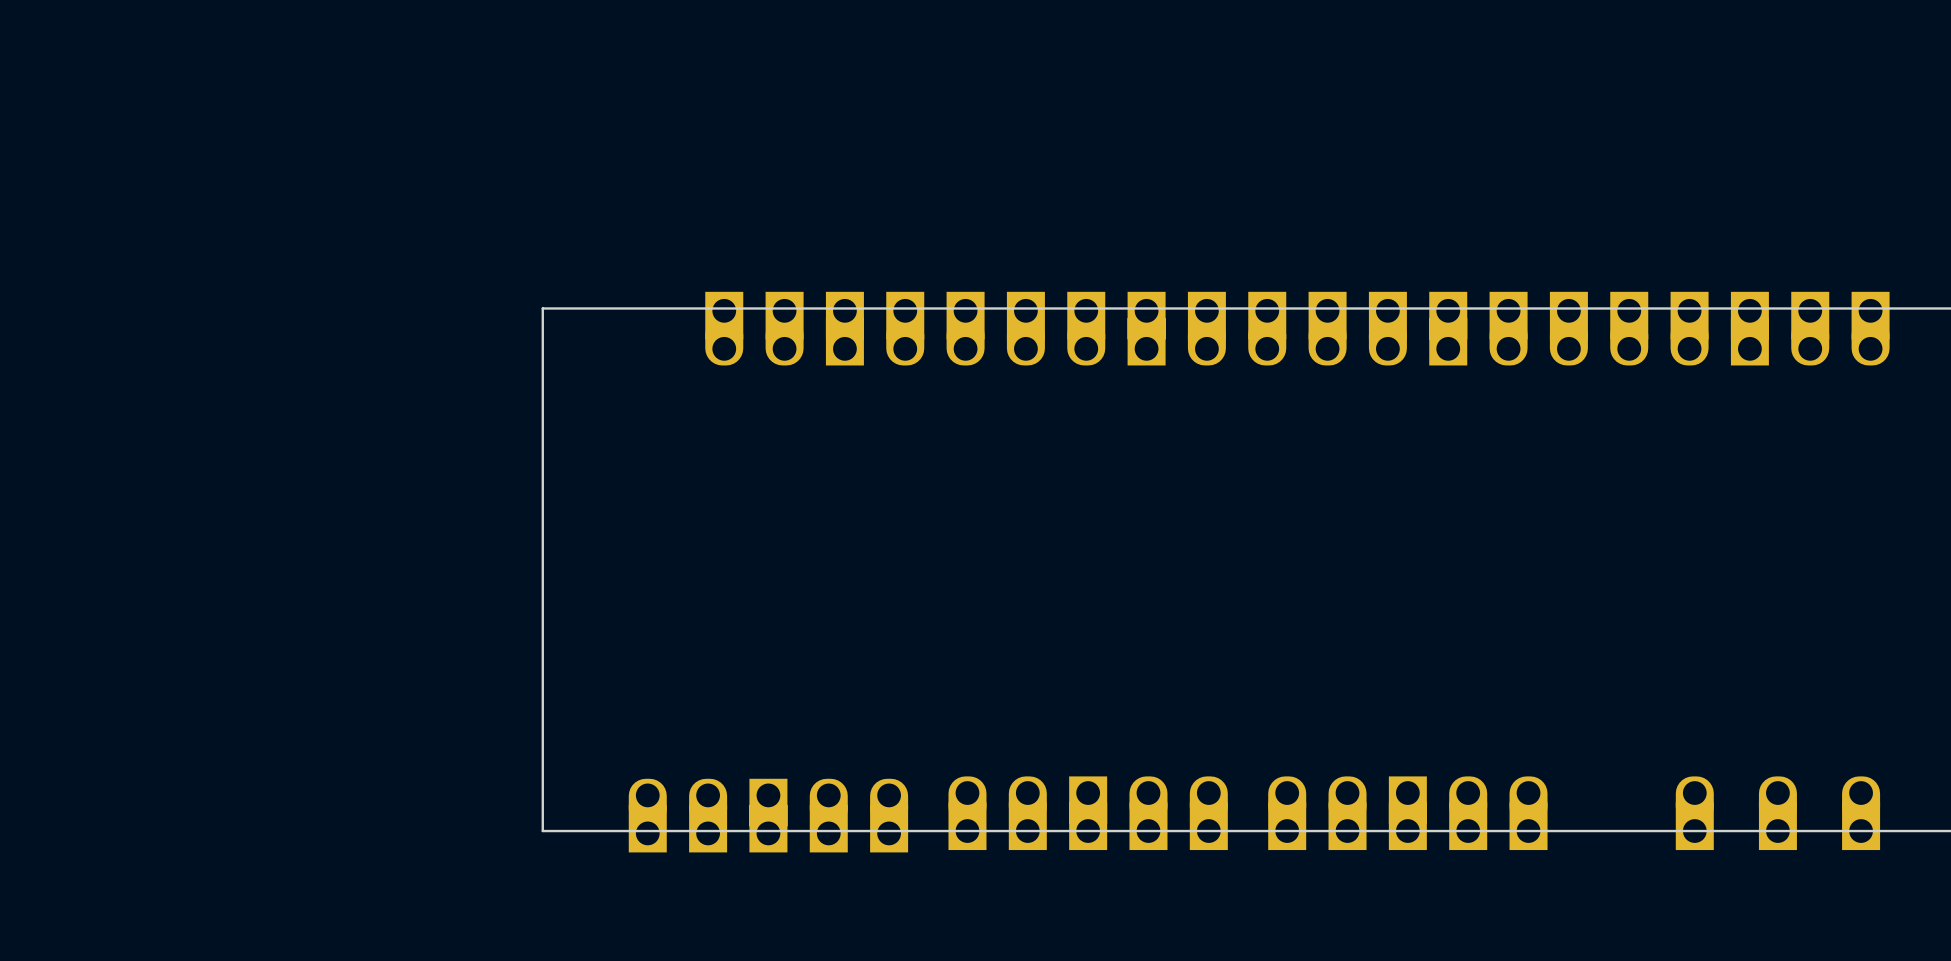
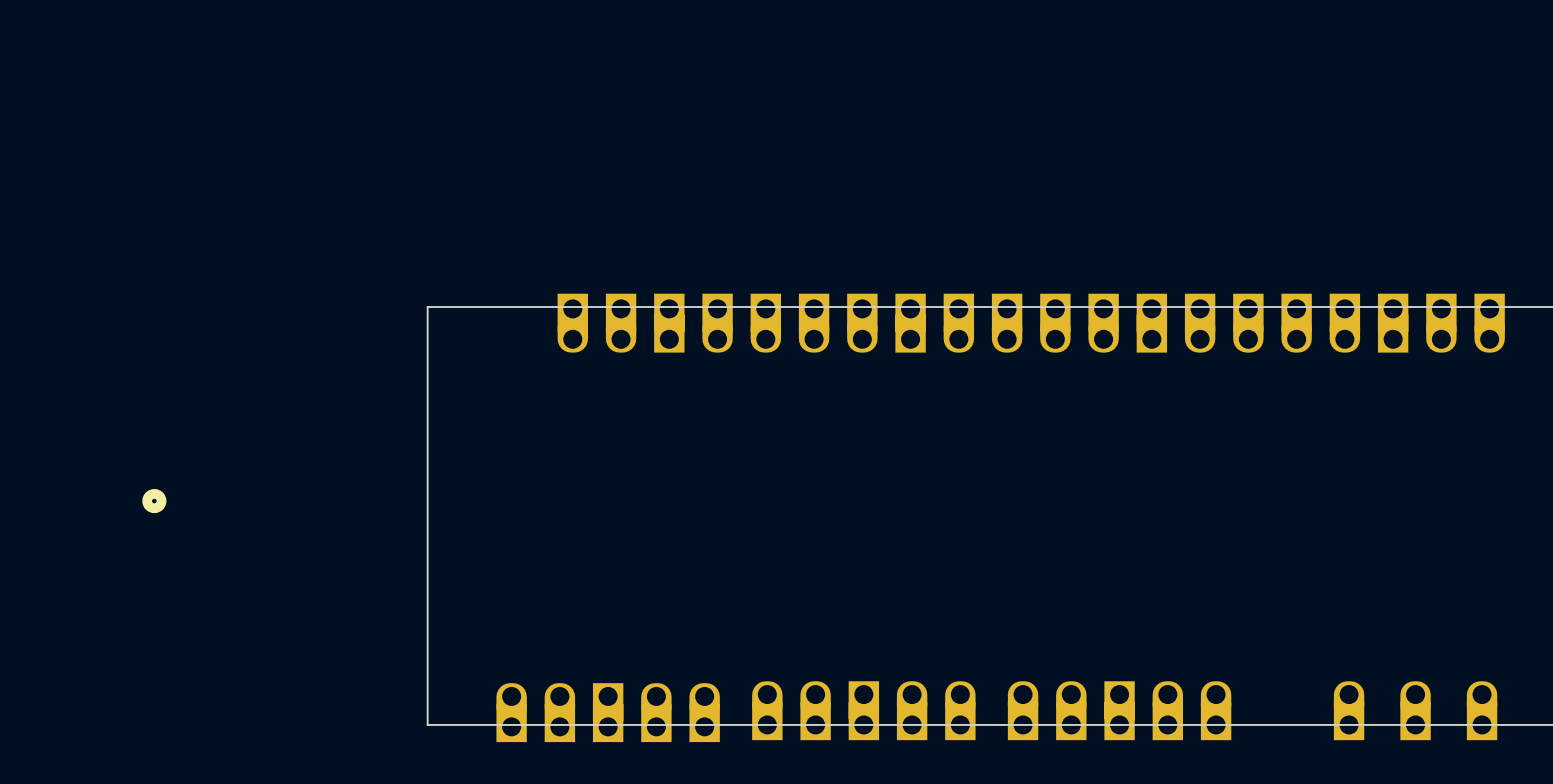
part: none -> (154, 501)

